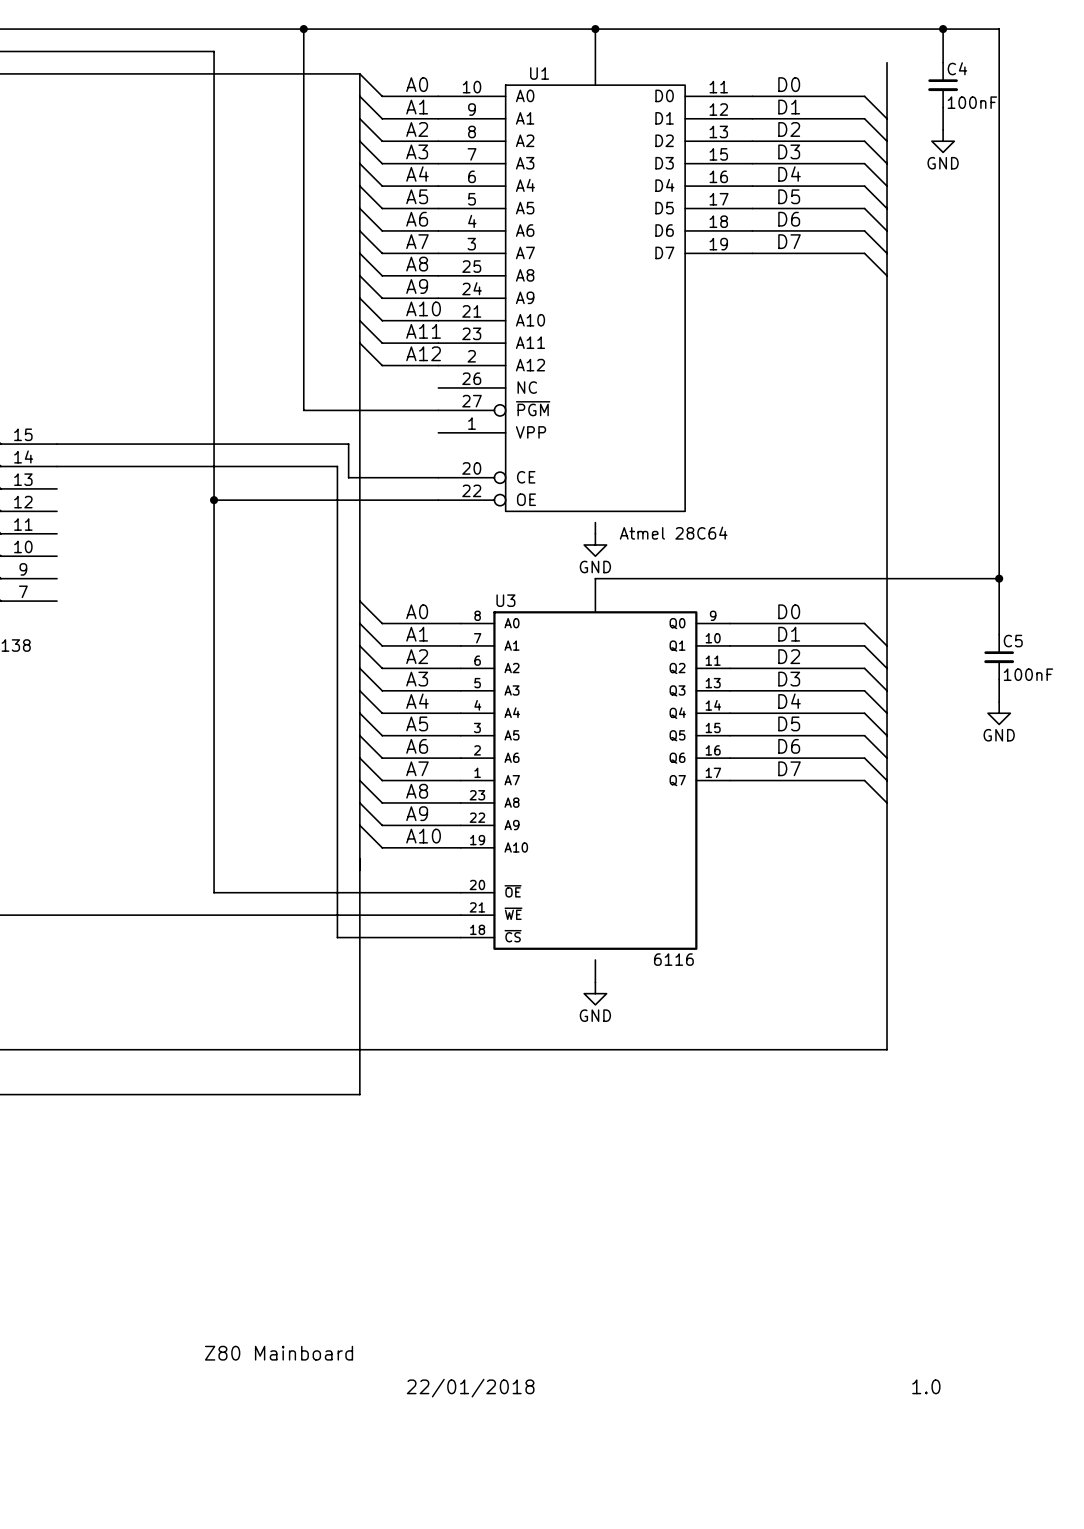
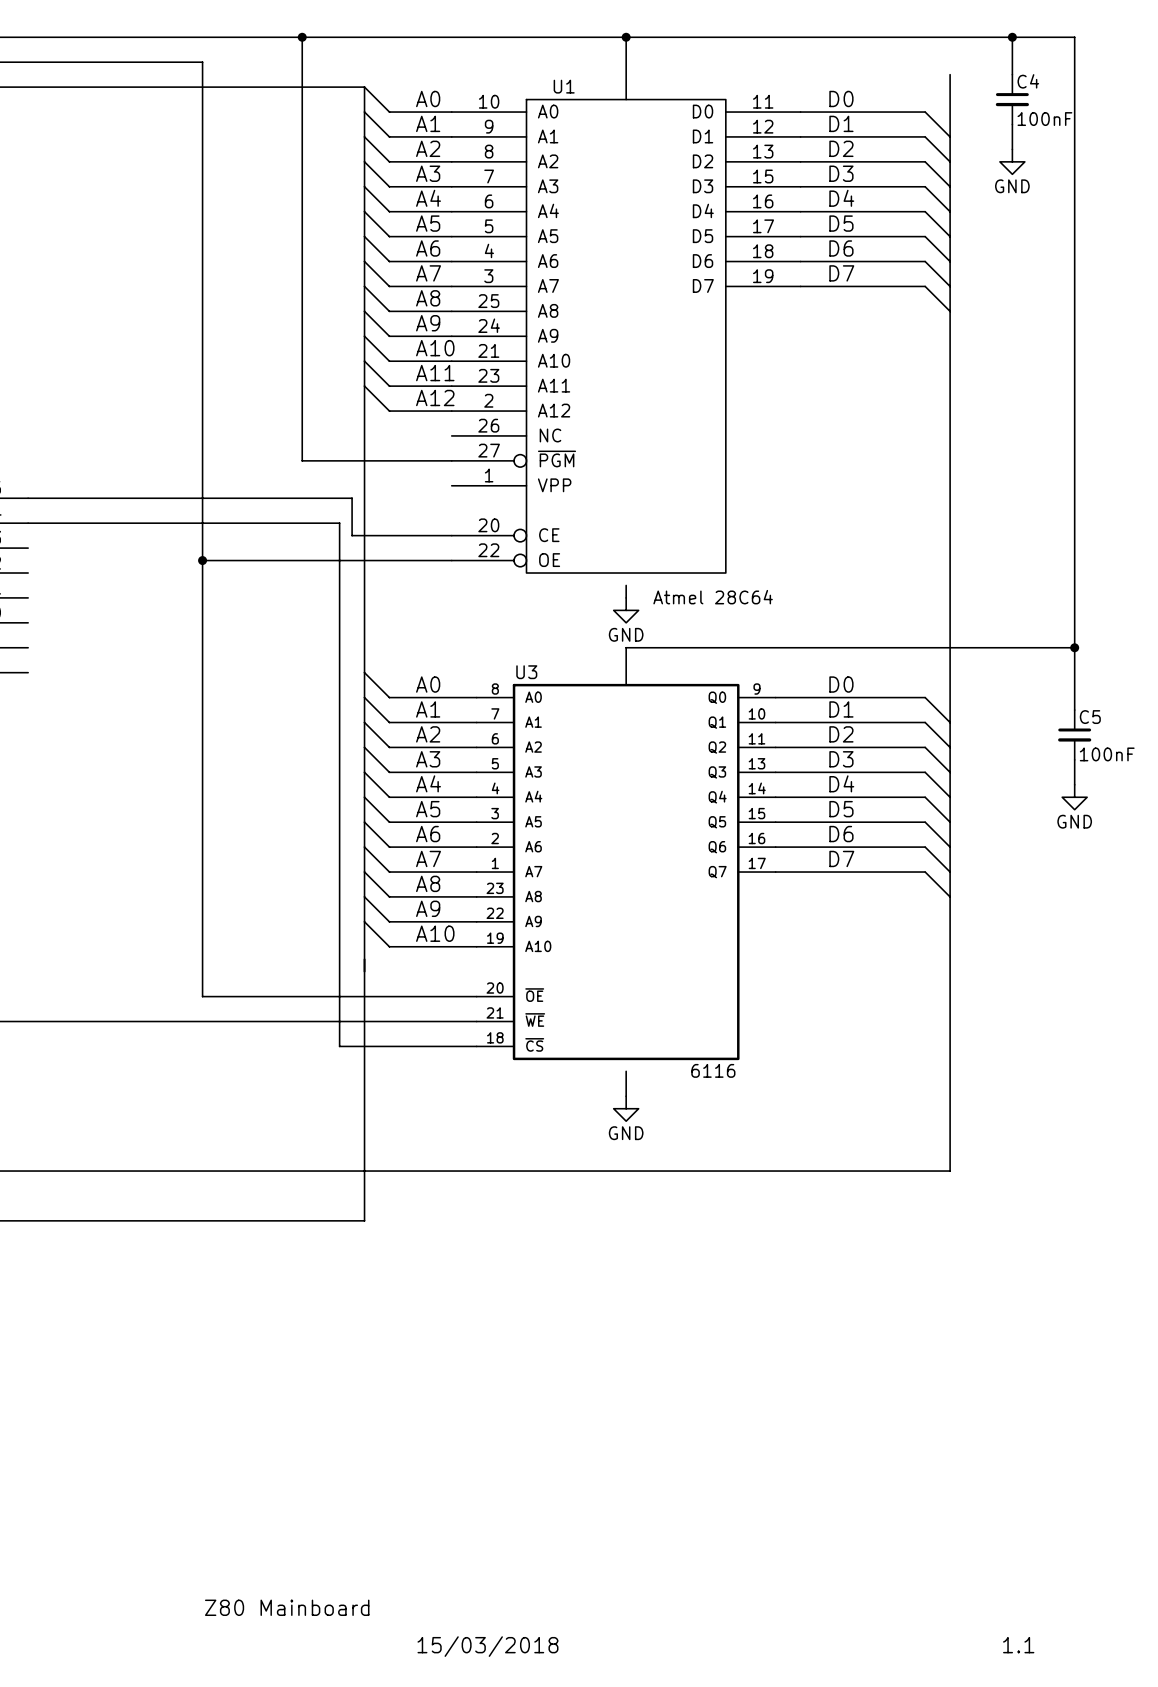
text position: Z80 Mainboard (279, 1353) -> Z80 Mainboard (287, 1607)
text: 1.0 (926, 1386) -> none
text: 22/01/2018 (470, 1388) -> none
text: none -> 1.1 (1018, 1645)
text: none -> 15/03/2018 (487, 1646)

